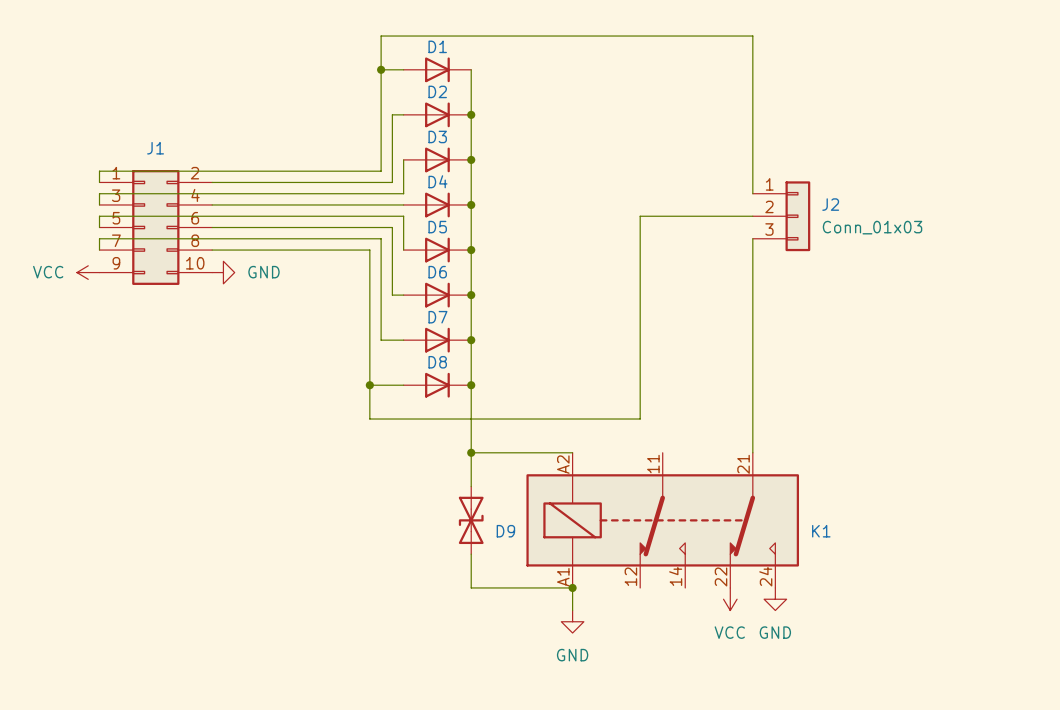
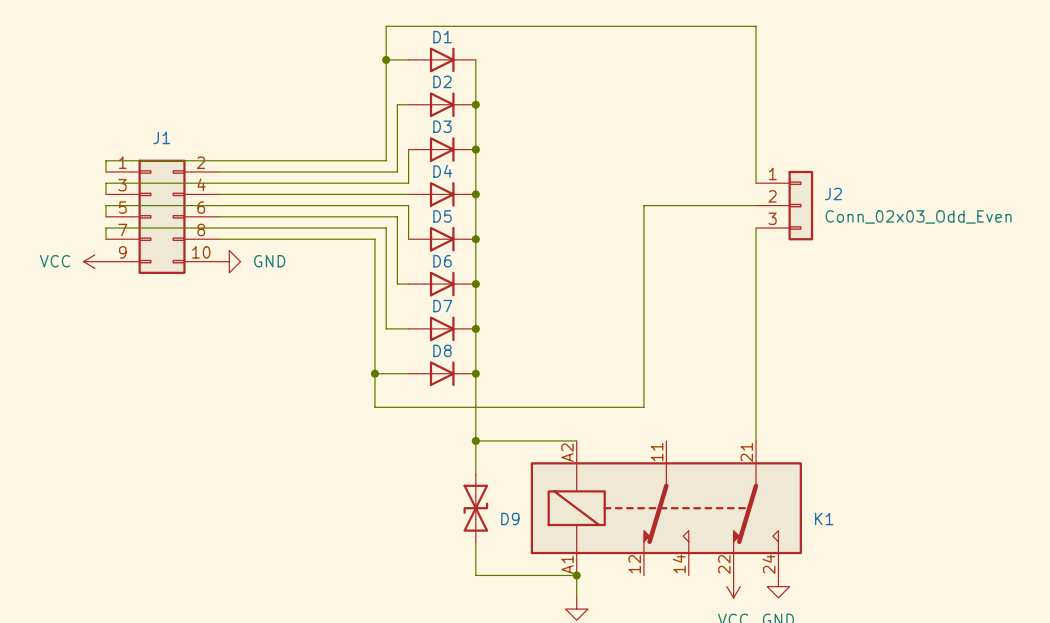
J2 value: Conn_01x03 (872, 227) -> Conn_02x03_Odd_Even (918, 216)

